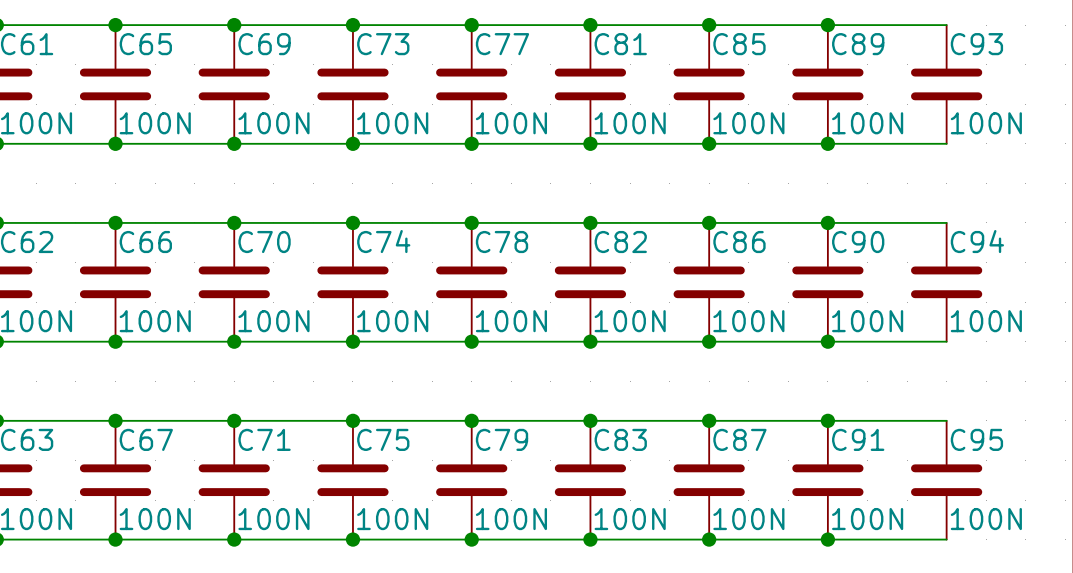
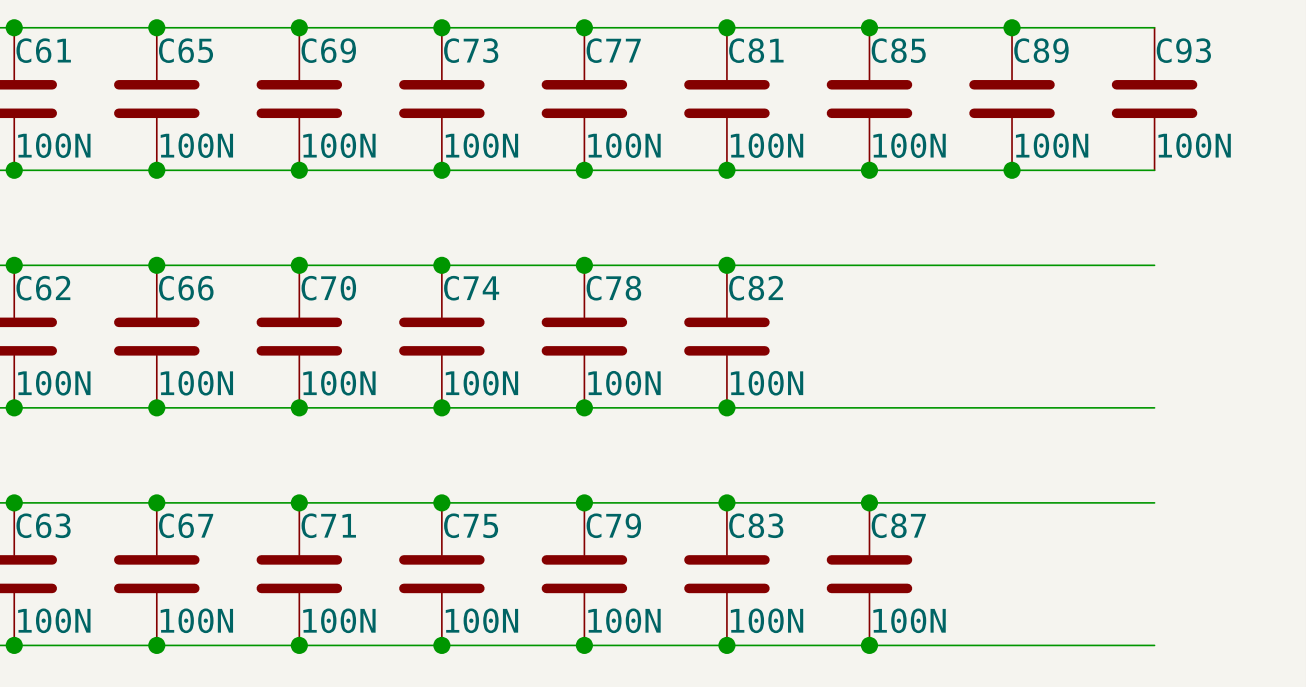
junction: (709, 222) -> none
junction: (827, 222) -> none
C86: 100N (709, 282) -> none
C90: 100N (827, 282) -> none
C94: 100N (946, 282) -> none
junction: (709, 341) -> none
junction: (827, 341) -> none
junction: (827, 420) -> none
C91: 100N (827, 480) -> none
C95: 100N (946, 480) -> none
junction: (827, 539) -> none

